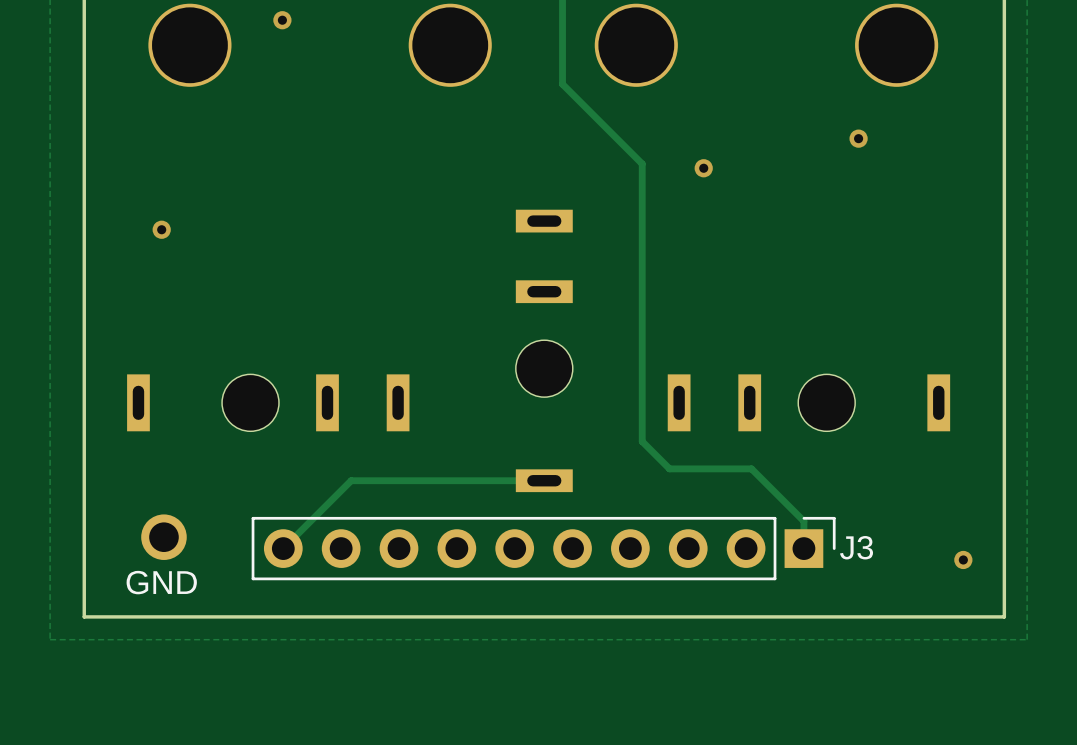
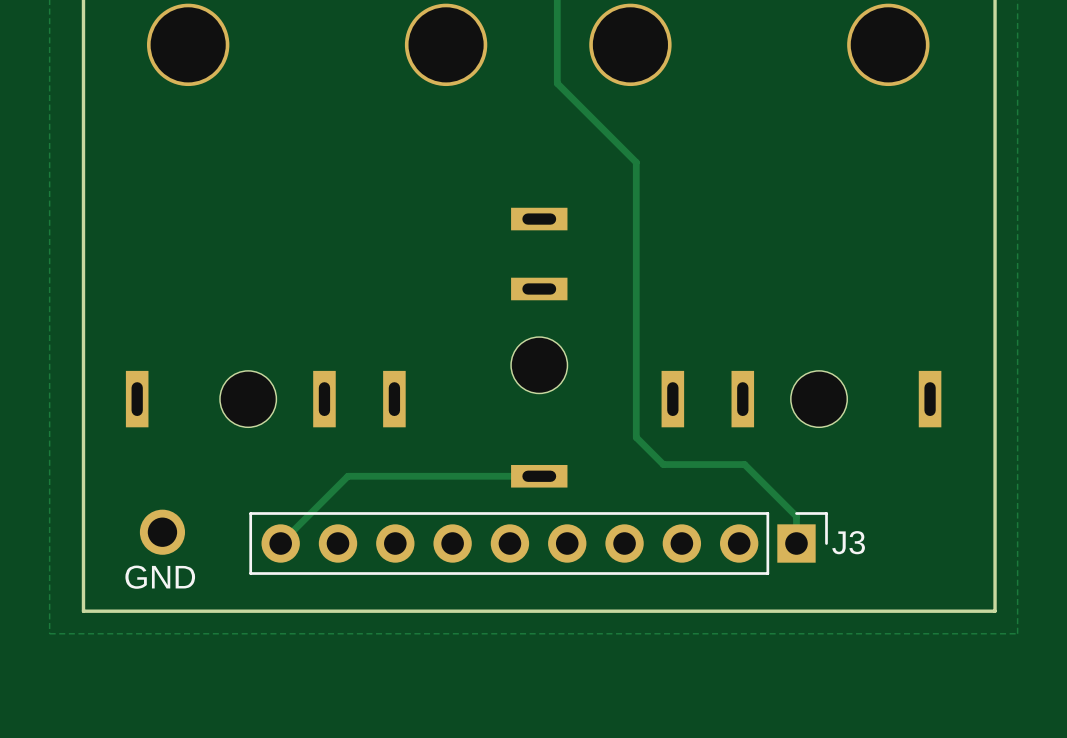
via: (282, 20) -> none
via: (858, 138) -> none
via: (703, 168) -> none
via: (161, 229) -> none
via: (963, 559) -> none

